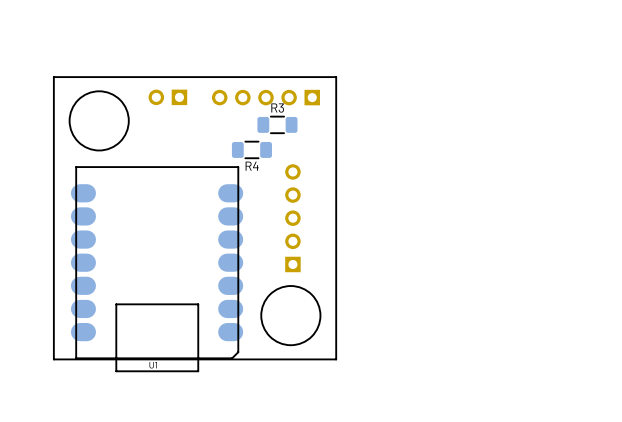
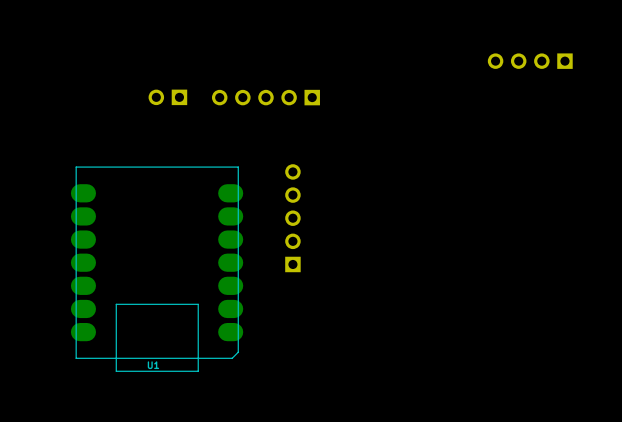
part: none -> (530, 61)
board edge: (336, 77) (53, 77) (53, 359) (336, 359) (336, 77) -> none
round board edge: [69, 90, 130, 151] -> none
R3: (277, 124) -> none
R4: (251, 149) -> none
round board edge: [260, 285, 321, 346] -> none

